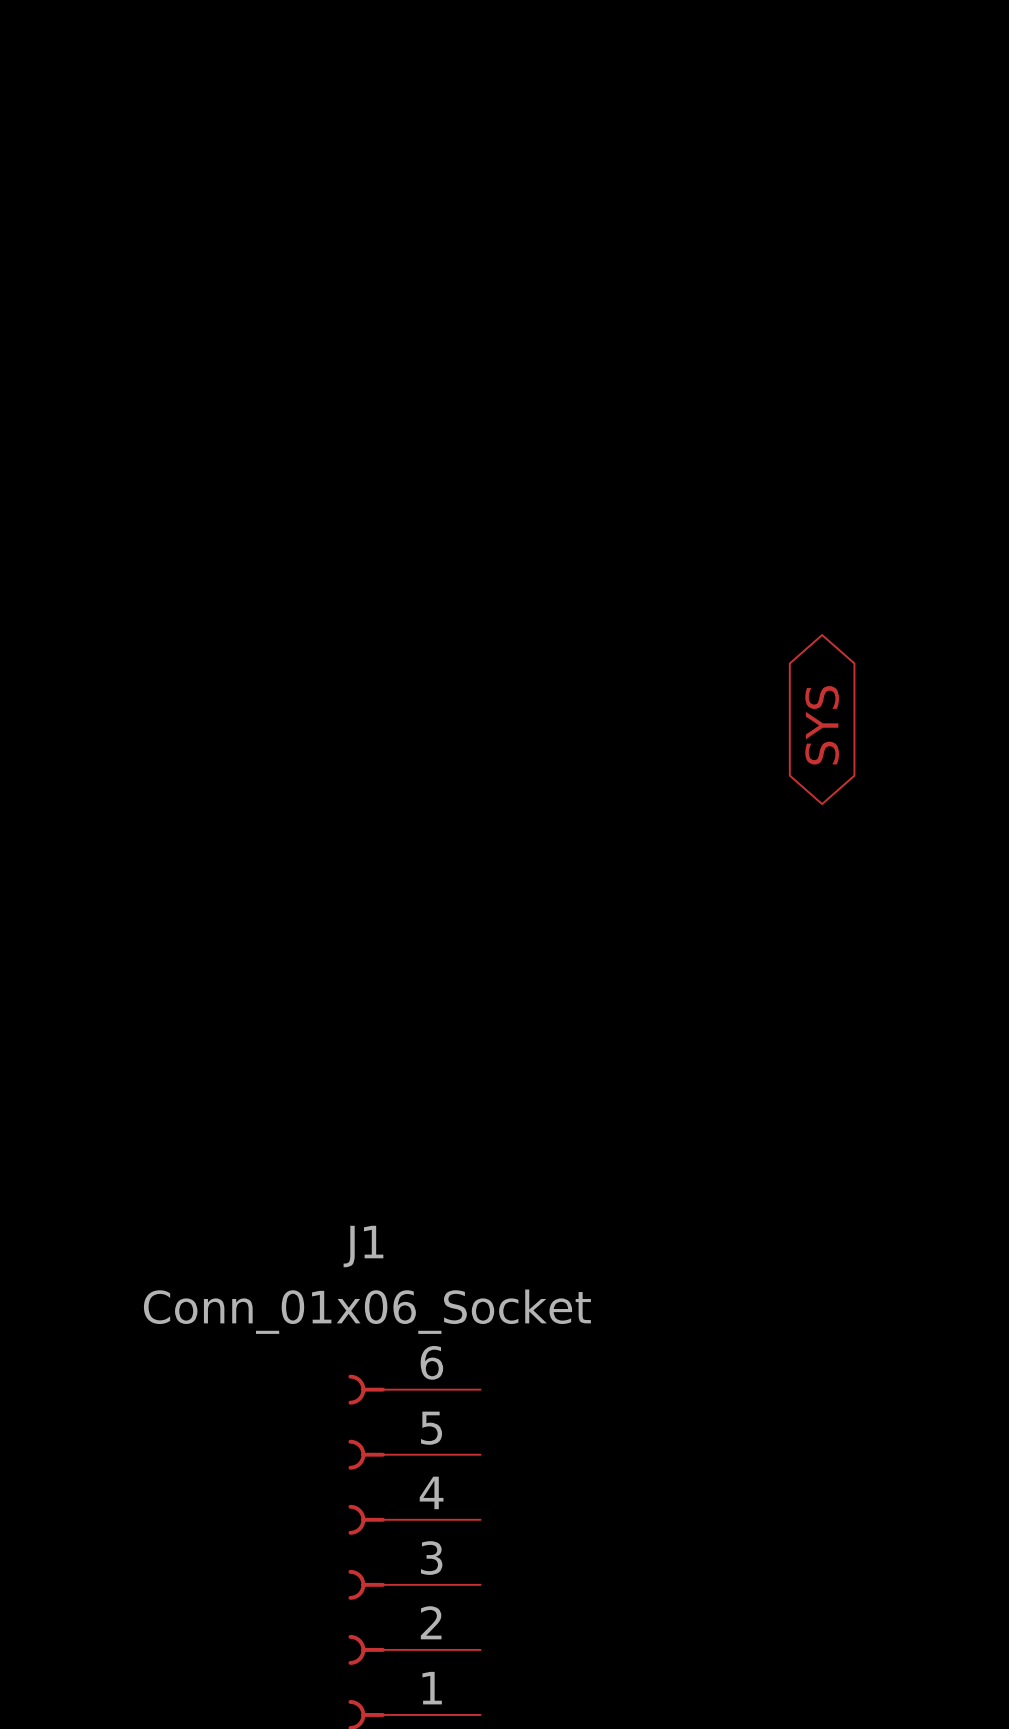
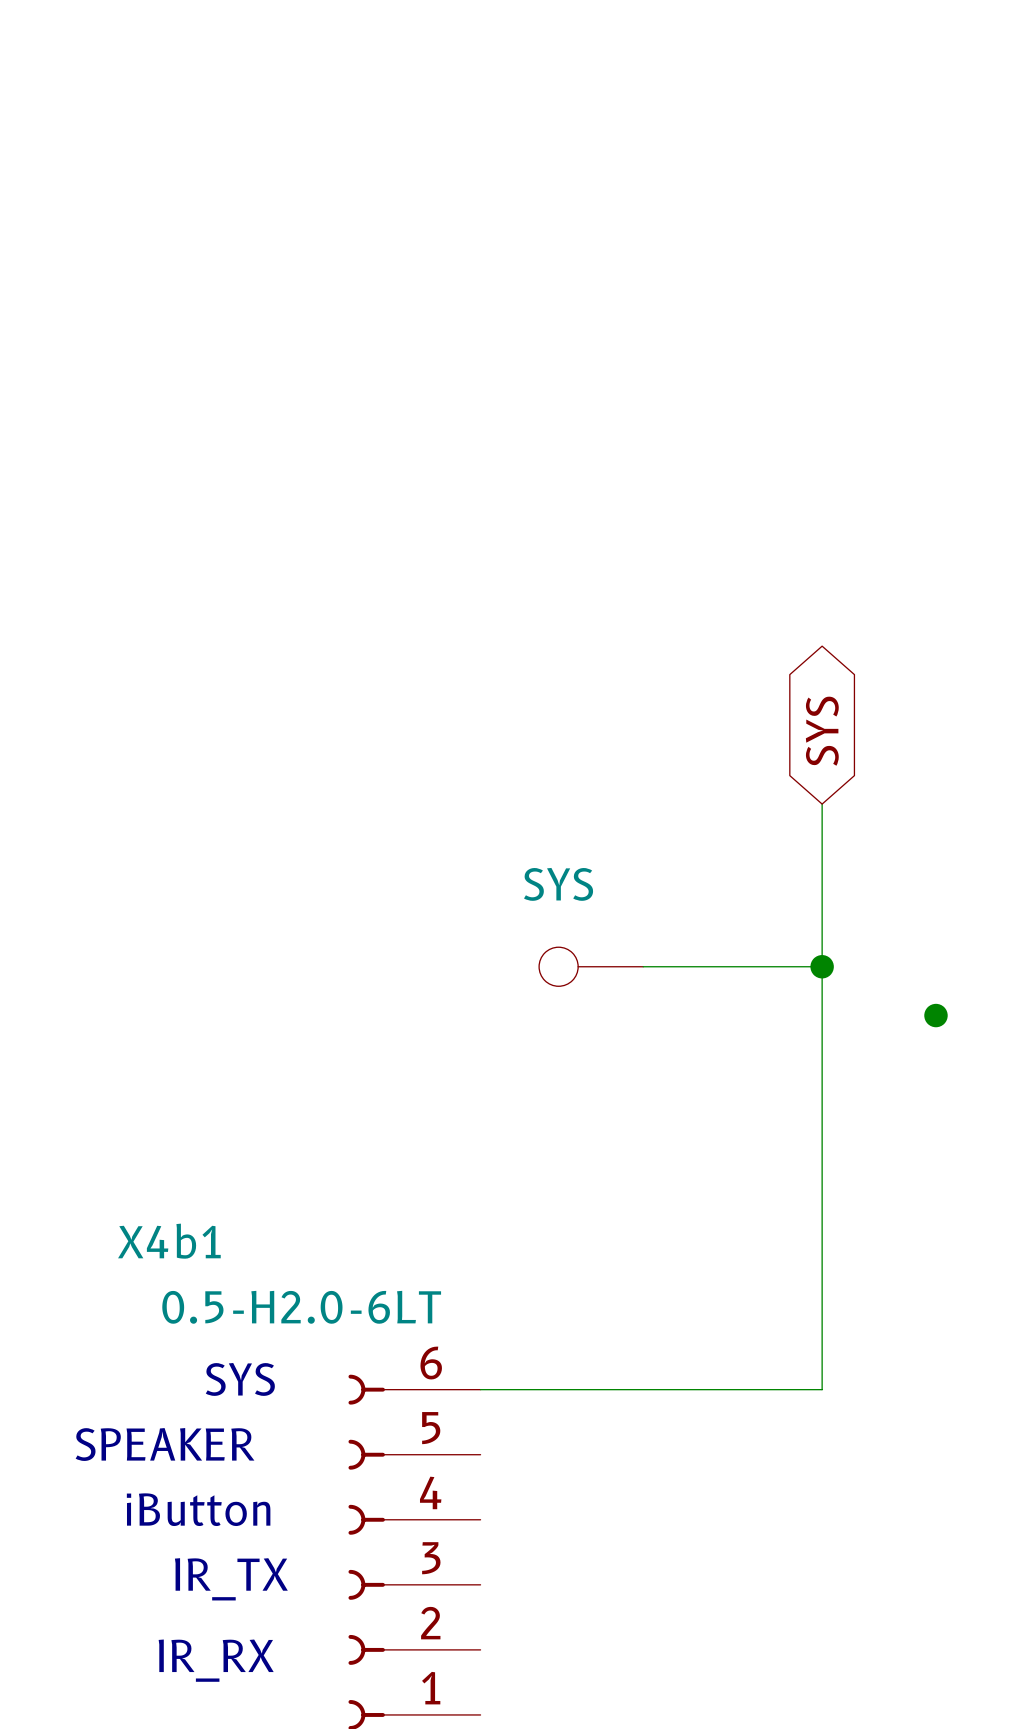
wire: none -> (822, 804) (822, 1389) (480, 1389)
part: none -> SYS (591, 966)
wire: none -> (643, 966) (822, 966)
junction: none -> (822, 966)
junction: none -> (935, 1015)
J1 name: J1 (363, 1246) -> X4b1 (169, 1241)
J1 value: Conn_01x06_Socket (367, 1311) -> 0.5-H2.0-6LT (301, 1307)
text: none -> SYS (240, 1379)
text: none -> SPEAKER (165, 1444)
text: none -> iButton (198, 1509)
text: none -> IR_TX (231, 1579)
text: none -> IR_RX (216, 1660)

